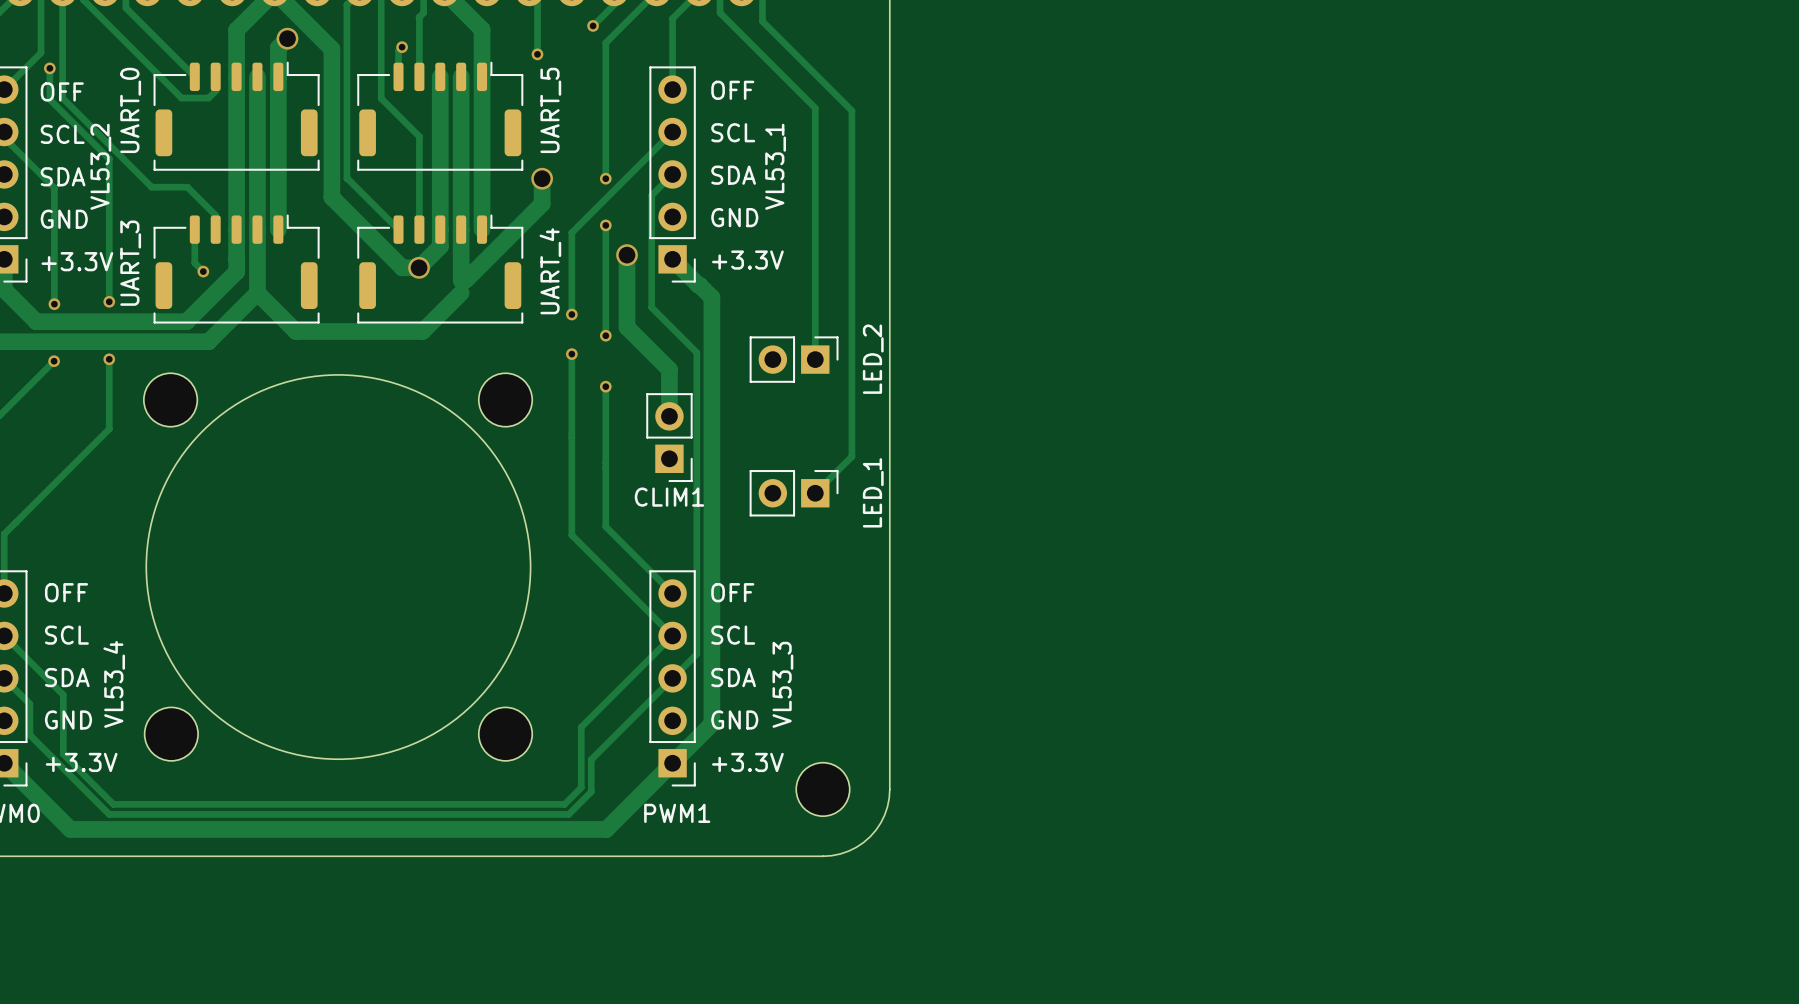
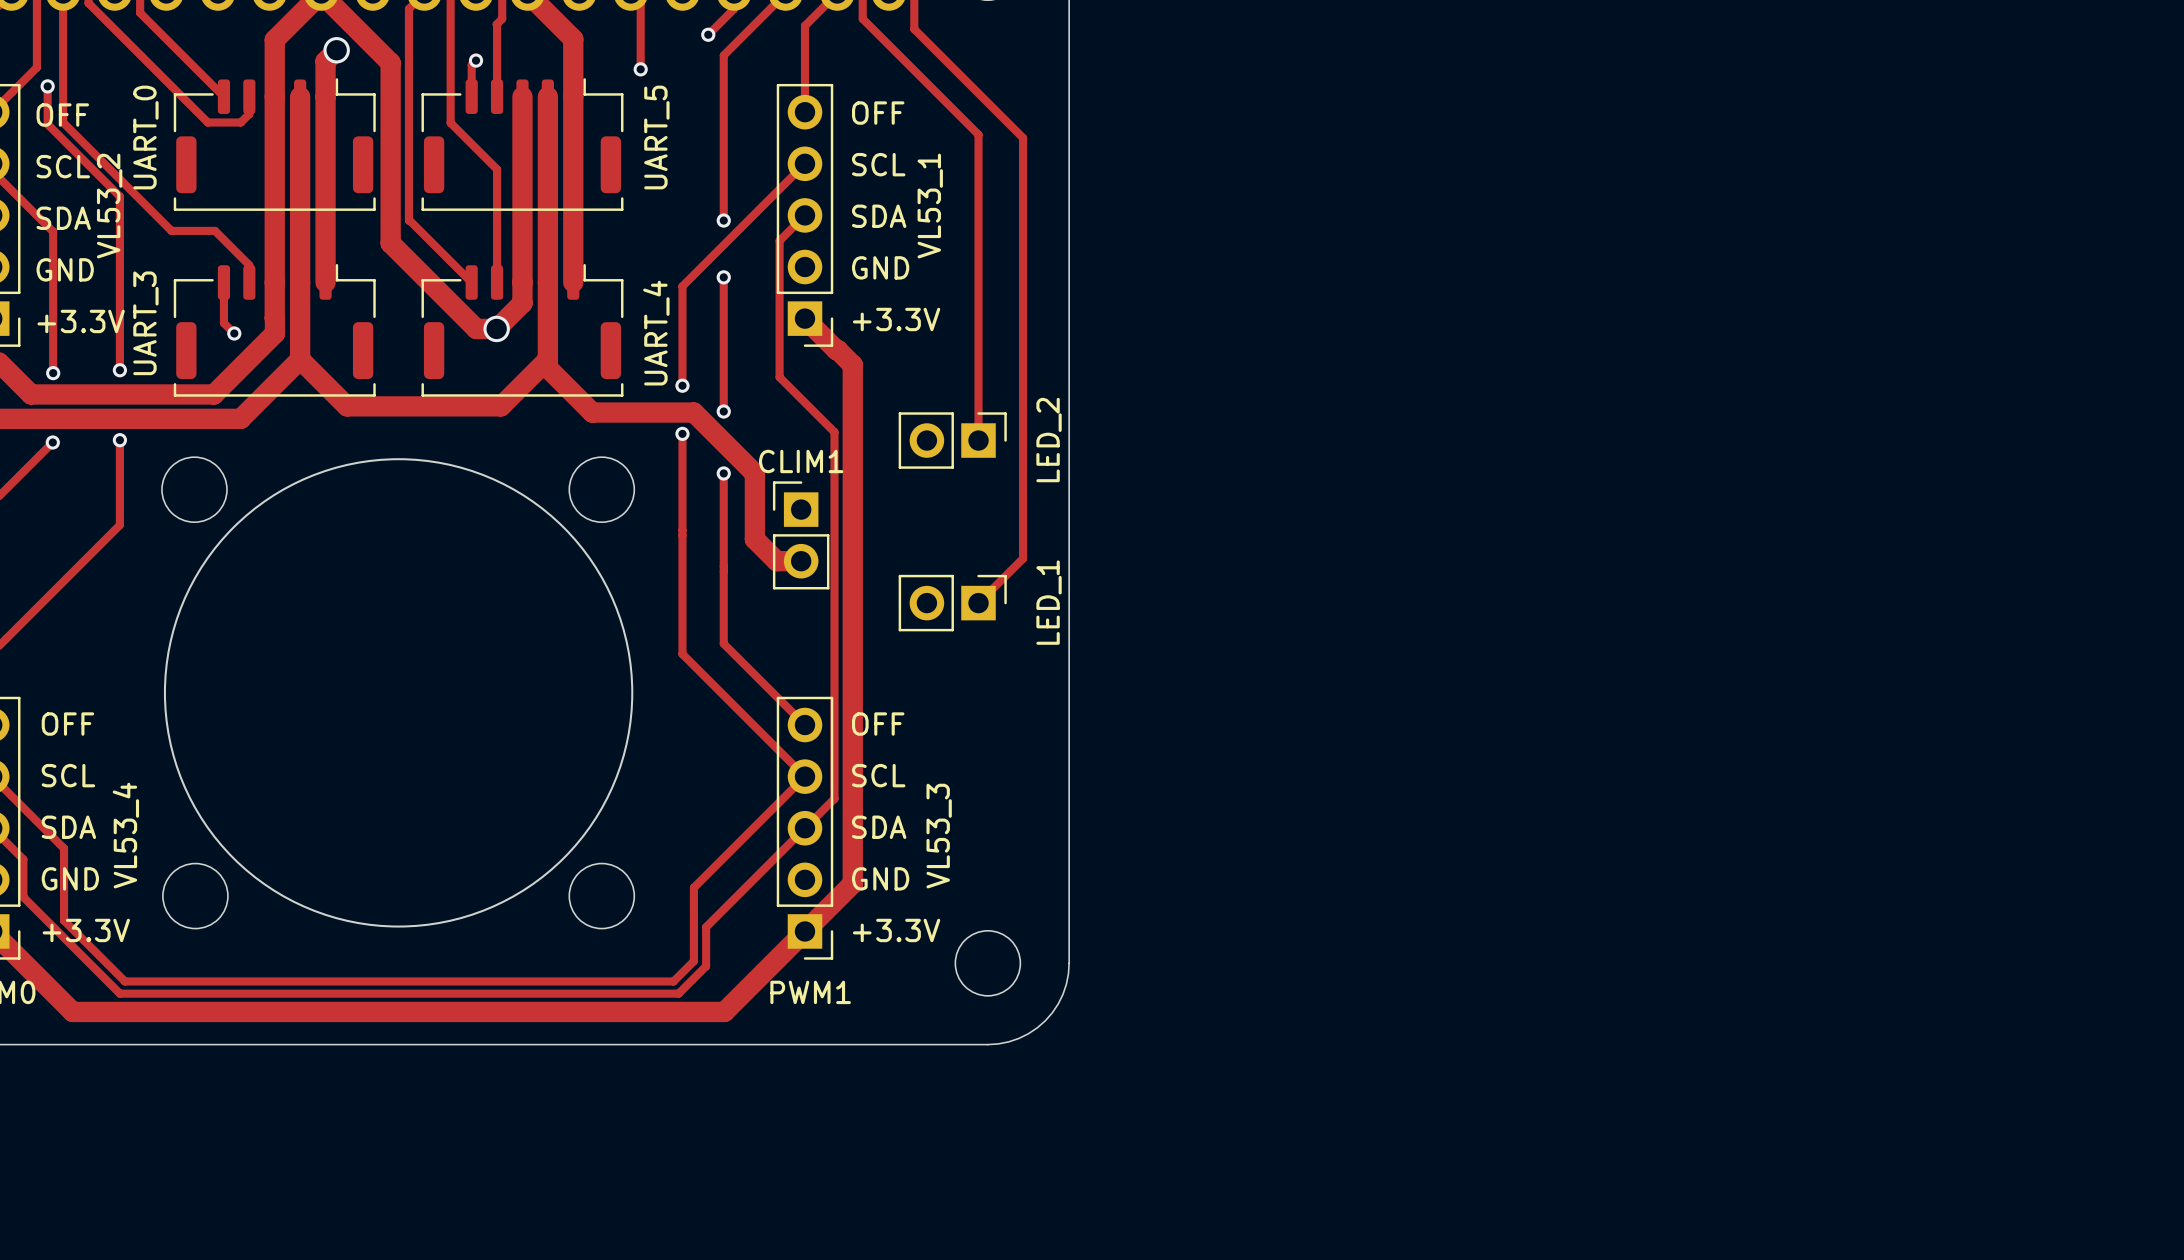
track: (542, 178) (542, 203) (465, 280) -> none
via: (542, 178) -> none
track: (627, 255) (627, 327) (669, 369) (669, 416) -> none
via: (627, 255) -> none
track: none -> (547, 344) (547, 368) (592, 412) (693, 412) (754, 473) (754, 539) (776, 561) (801, 561)
CLIM1 rotation: 0° (669, 437) -> 180° (801, 535)

